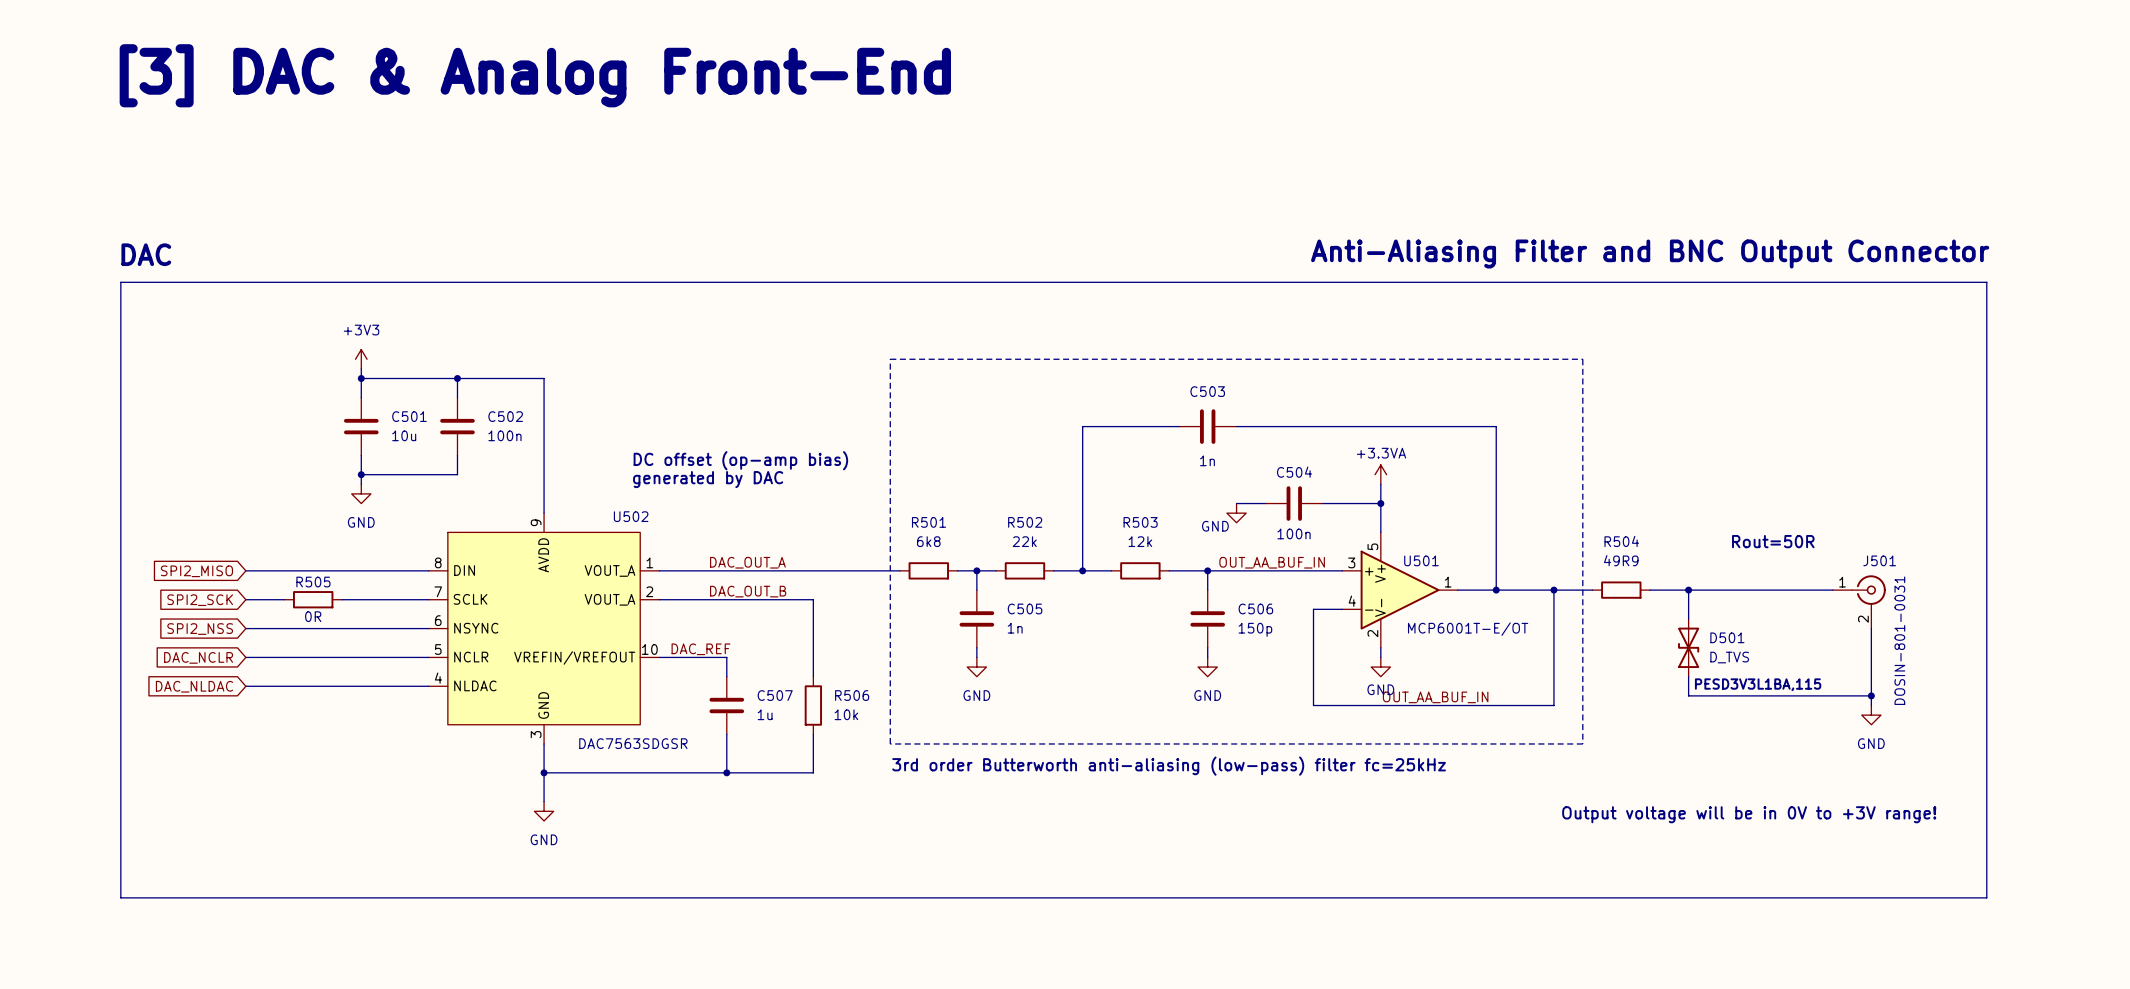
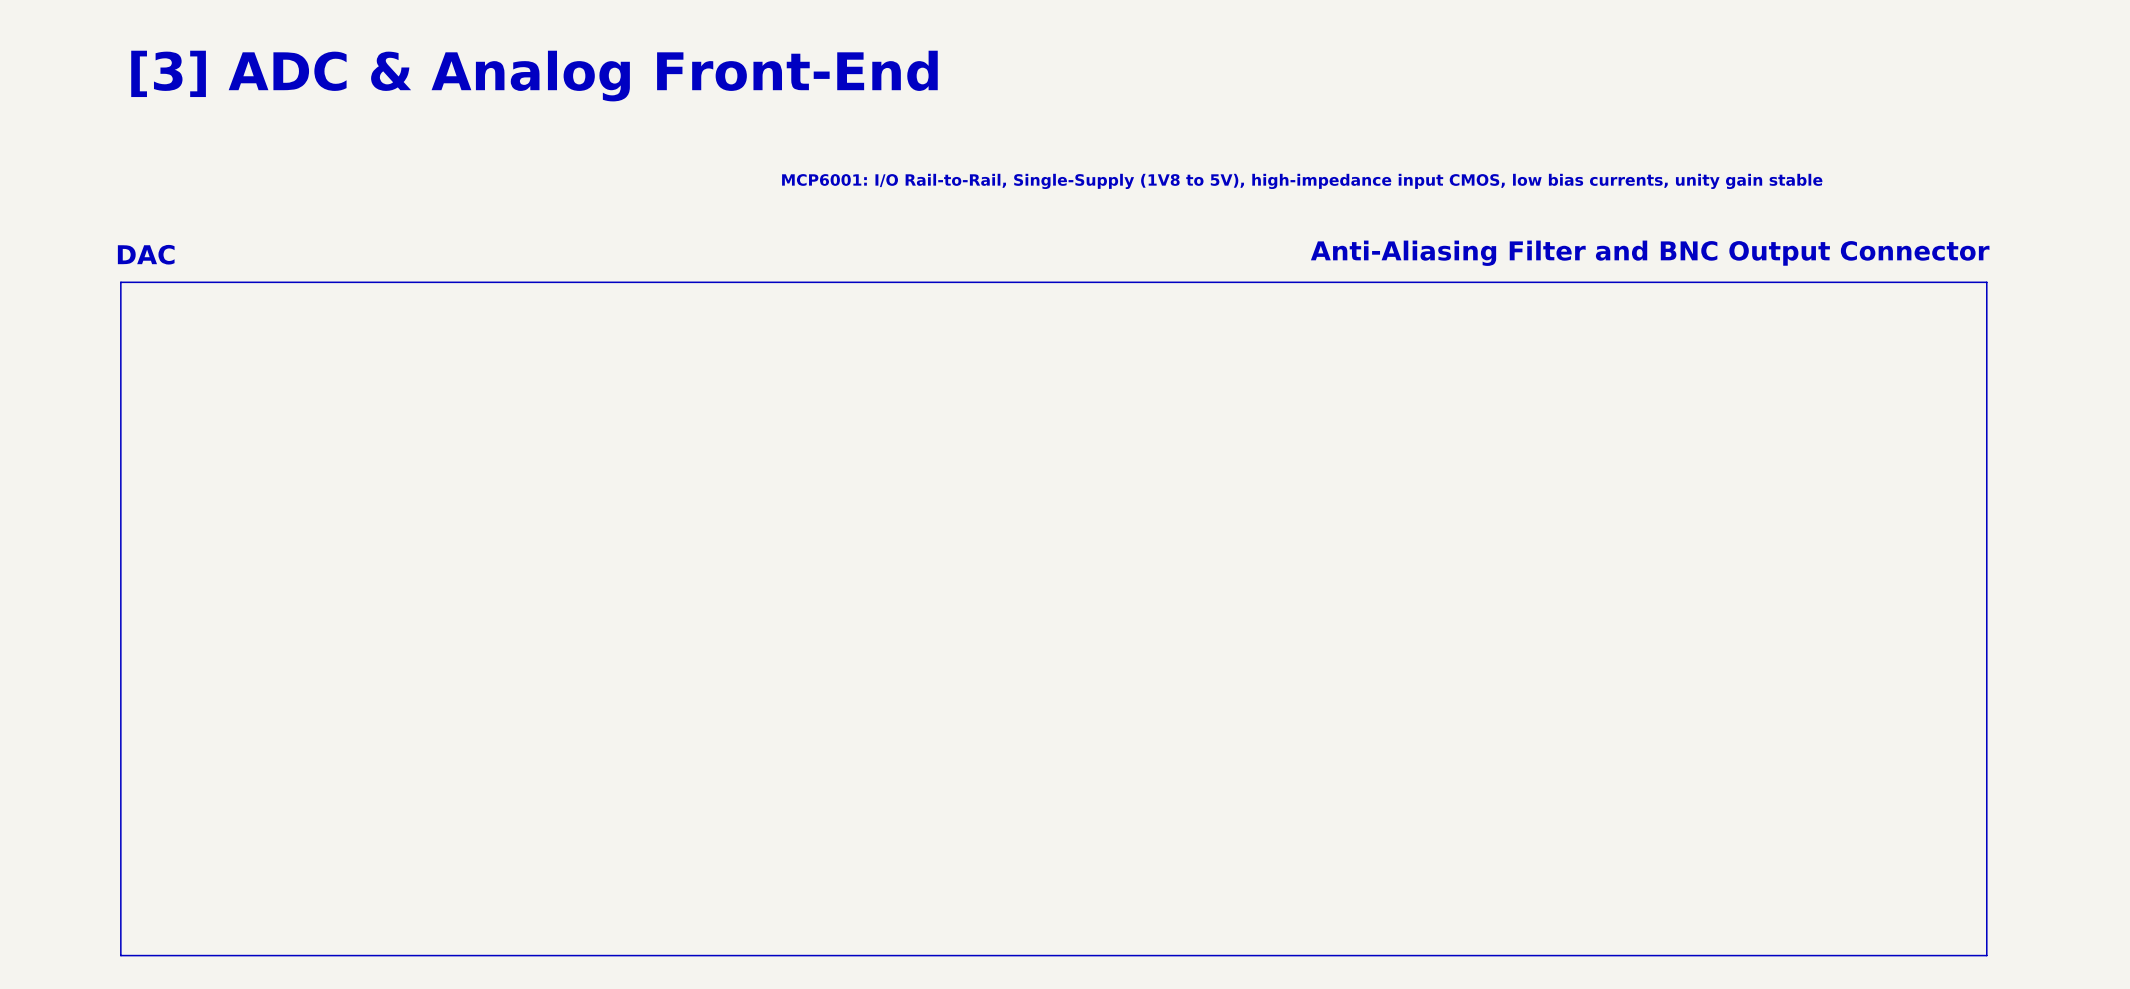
text: [3] DAC & Analog Front-End (535, 75) -> [3] ADC & Analog Front-End (534, 76)
text: none -> MCP6001: I/O Rail-to-Rail, Single-Supply (1V8 to 5V), high-impedance input CMOS, low bias currents, unity gain stable (1302, 181)
power symbol: +3V3 (361, 359) -> none
line: (890, 359) (1582, 359) (1582, 743) (890, 743) (890, 359) -> none
wire: (361, 368) (361, 397) -> none
wire: (361, 378) (544, 378) (544, 513) -> none
junction: (361, 378) -> none
wire: (457, 378) (457, 397) -> none
junction: (457, 378) -> none
C501: 10u (361, 426) -> none
C502: 100n (457, 426) -> none
wire: (1178, 426) (1082, 426) (1082, 570) -> none
C503: 1n (1207, 426) -> none
wire: (1236, 426) (1496, 426) (1496, 590) -> none
wire: (361, 455) (361, 484) -> none
wire: (457, 455) (457, 474) (361, 474) -> none
text: DC offset (op-amp bias) (740, 460) -> none
junction: (361, 474) -> none
power symbol: +3.3VA (1380, 474) -> none
text: generated by DAC (708, 479) -> none
wire: (1380, 484) (1380, 532) -> none
power symbol: GND (361, 493) -> none
wire: (1236, 503) (1265, 503) -> none
C504: 100n (1294, 503) -> none
wire: (1323, 503) (1380, 503) -> none
junction: (1380, 503) -> none
power symbol: GND (1236, 513) -> none
text: Rout=50R (1773, 541) -> none
label: DAC_OUT_A (747, 562) -> none
label: OUT_AA_BUF_IN (1272, 562) -> none
wire: (245, 570) (428, 570) -> none
wire: (659, 570) (899, 570) -> none
R501: 6k8 (928, 570) -> none
wire: (957, 570) (996, 570) -> none
wire: (976, 570) (976, 590) -> none
junction: (976, 570) -> none
R502: 22k (1024, 570) -> none
wire: (1053, 570) (1111, 570) -> none
junction: (1082, 570) -> none
R503: 12k (1140, 570) -> none
wire: (1169, 570) (1342, 570) -> none
wire: (1207, 570) (1207, 590) -> none
junction: (1207, 570) -> none
global label: SPI2_MISO (196, 571) -> none
U501: MCP6001T-E/OT (1400, 590) -> none
wire: (1457, 590) (1592, 590) -> none
junction: (1496, 590) -> none
wire: (1553, 590) (1553, 705) (1313, 705) (1313, 609) (1342, 609) -> none
junction: (1553, 590) -> none
R504: 49R9 (1621, 590) -> none
wire: (1650, 590) (1832, 590) -> none
wire: (1688, 590) (1688, 618) -> none
junction: (1688, 590) -> none
label: DAC_OUT_B (748, 591) -> none
wire: (245, 599) (284, 599) -> none
R505: 0R (313, 599) -> none
wire: (342, 599) (428, 599) -> none
wire: (659, 599) (813, 599) (813, 676) -> none
global label: SPI2_SCK (200, 600) -> none
J501: DOSIN-801-0031 (1859, 601) -> none
C505: 1n (976, 618) -> none
C506: 150p (1207, 618) -> none
wire: (245, 628) (428, 628) -> none
U502: DAC7563SDGSR (544, 628) -> none
wire: (1871, 628) (1871, 705) -> none
global label: SPI2_NSS (200, 629) -> none
wire: (976, 647) (976, 657) -> none
wire: (1207, 647) (1207, 657) -> none
wire: (1380, 647) (1380, 657) -> none
D501: D_TVS (1688, 647) -> none
label: DAC_REF (700, 649) -> none
global label: DAC_NCLR (198, 657) -> none
wire: (245, 657) (428, 657) -> none
wire: (659, 657) (726, 657) (726, 676) -> none
power symbol: GND (976, 667) -> none
power symbol: GND (1207, 667) -> none
power symbol: GND (1380, 667) -> none
wire: (1688, 676) (1688, 695) (1871, 695) -> none
text: PESD3V3L1BA,115 (1758, 684) -> none
global label: DAC_NLDAC (194, 686) -> none
wire: (245, 686) (428, 686) -> none
junction: (1871, 695) -> none
label: OUT_AA_BUF_IN (1435, 697) -> none
C507: 1u (726, 705) -> none
R506: 10k (813, 705) -> none
power symbol: GND (1871, 715) -> none
wire: (726, 734) (726, 772) -> none
wire: (813, 734) (813, 772) (544, 772) -> none
wire: (544, 743) (544, 801) -> none
text: 3rd order Butterworth anti-aliasing (low-pass) filter fc=25kHz (1169, 766) -> none
junction: (544, 772) -> none
junction: (726, 772) -> none
power symbol: GND (544, 811) -> none
text: Output voltage will be in 0V to +3V range! (1749, 814) -> none
line: (120, 897) (1986, 897) -> (120, 897) (120, 955) (1986, 955) (1986, 897)

